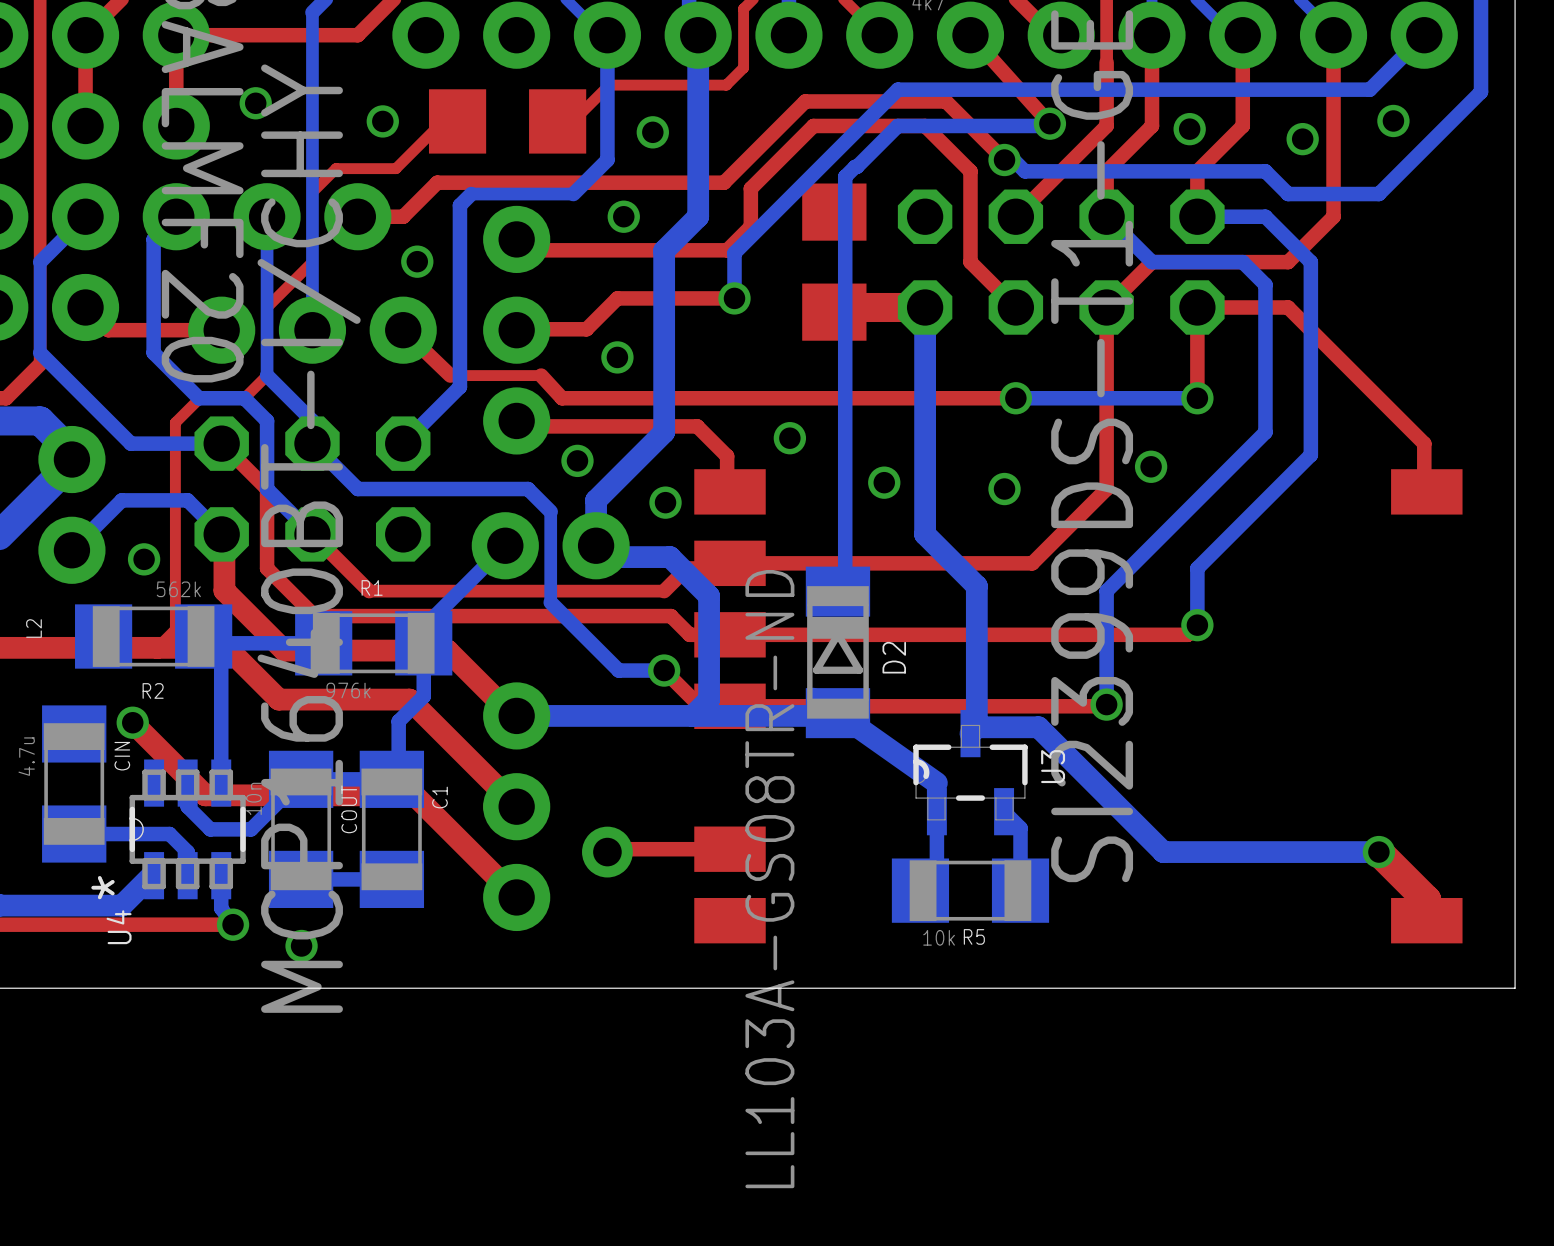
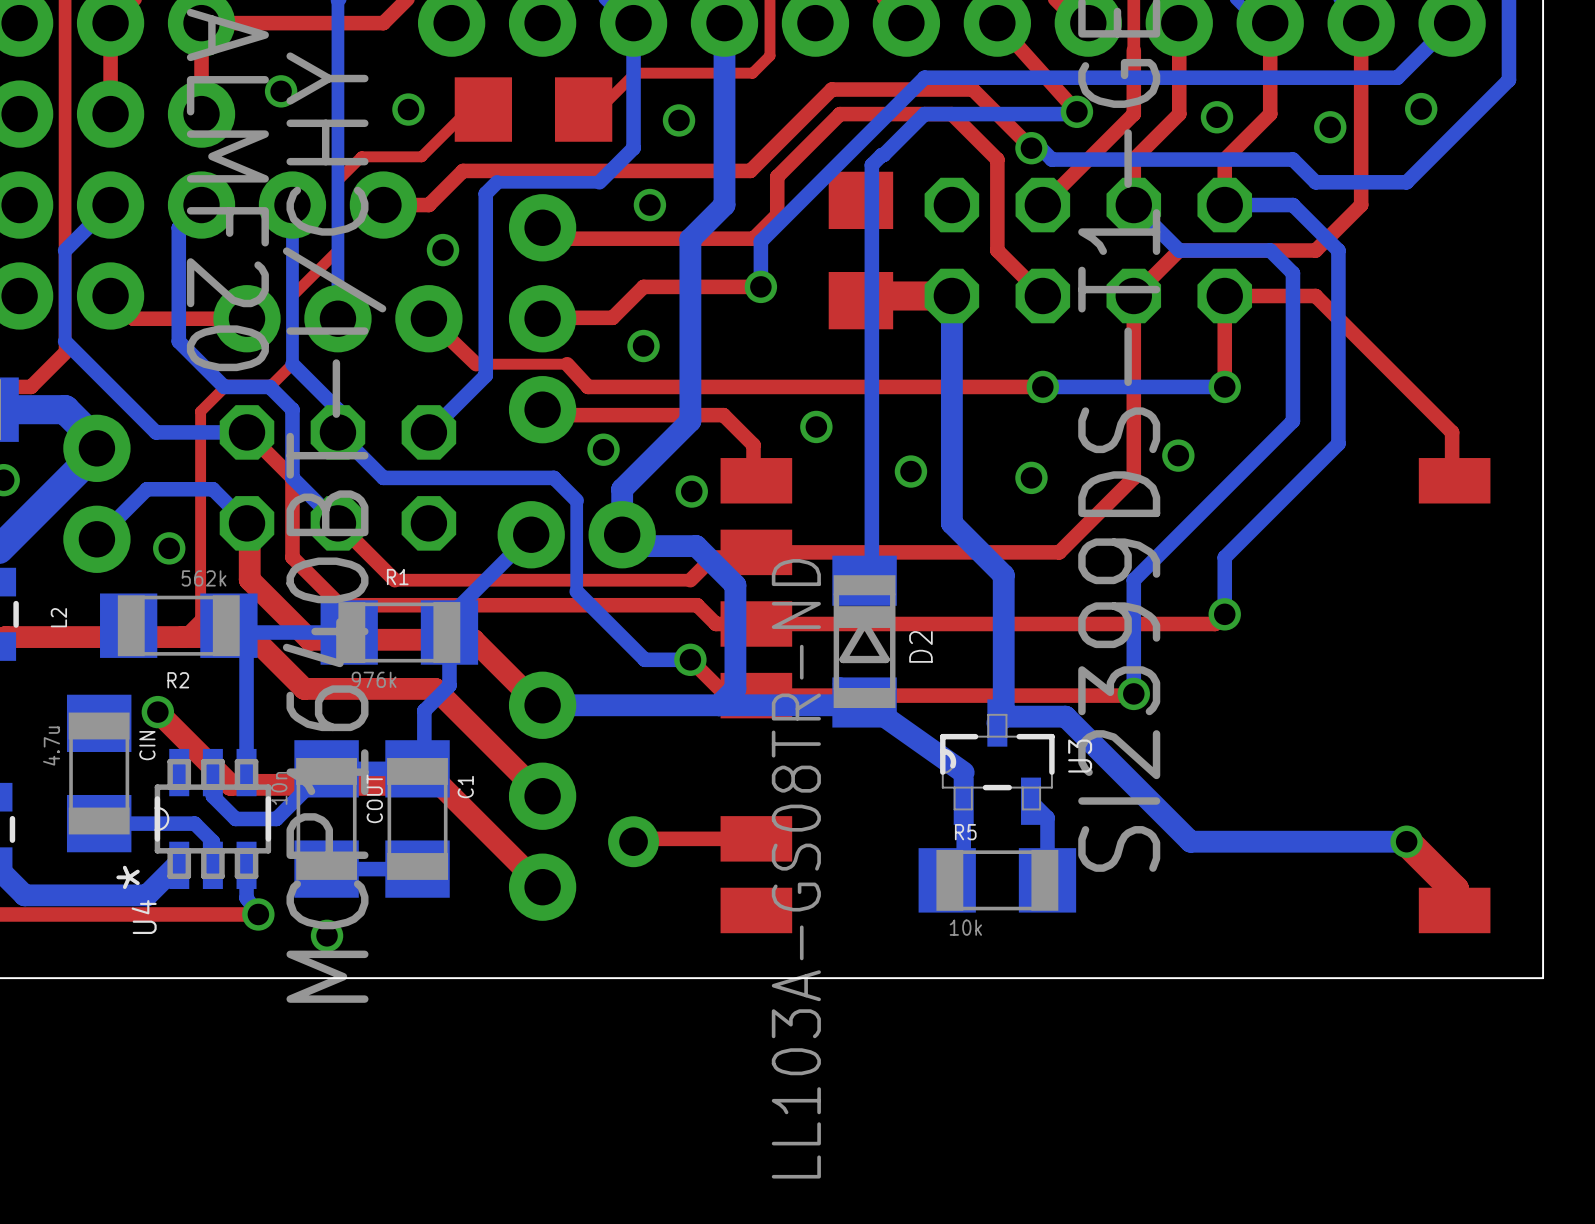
R5 name position: R5 (974, 936) -> R5 (965, 832)

